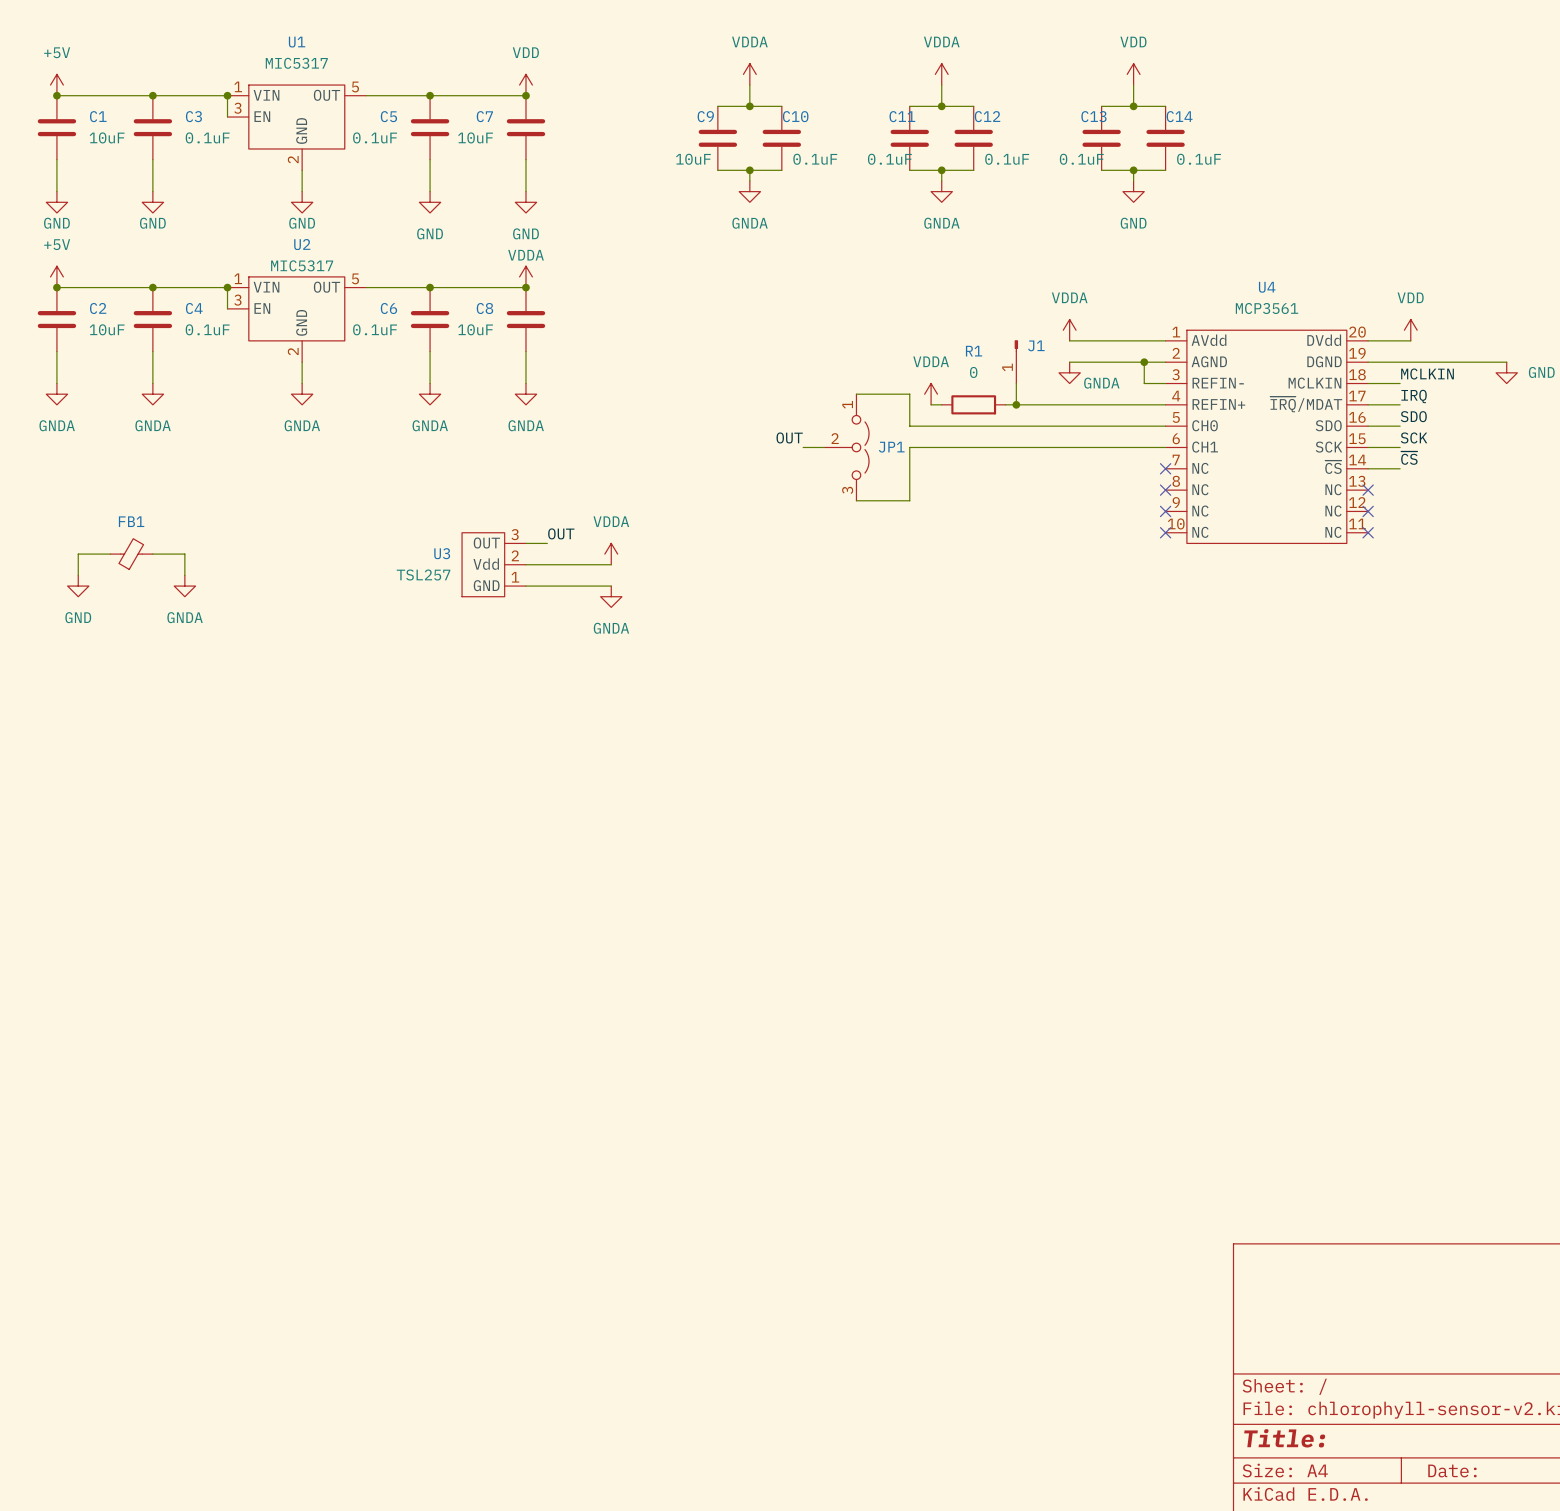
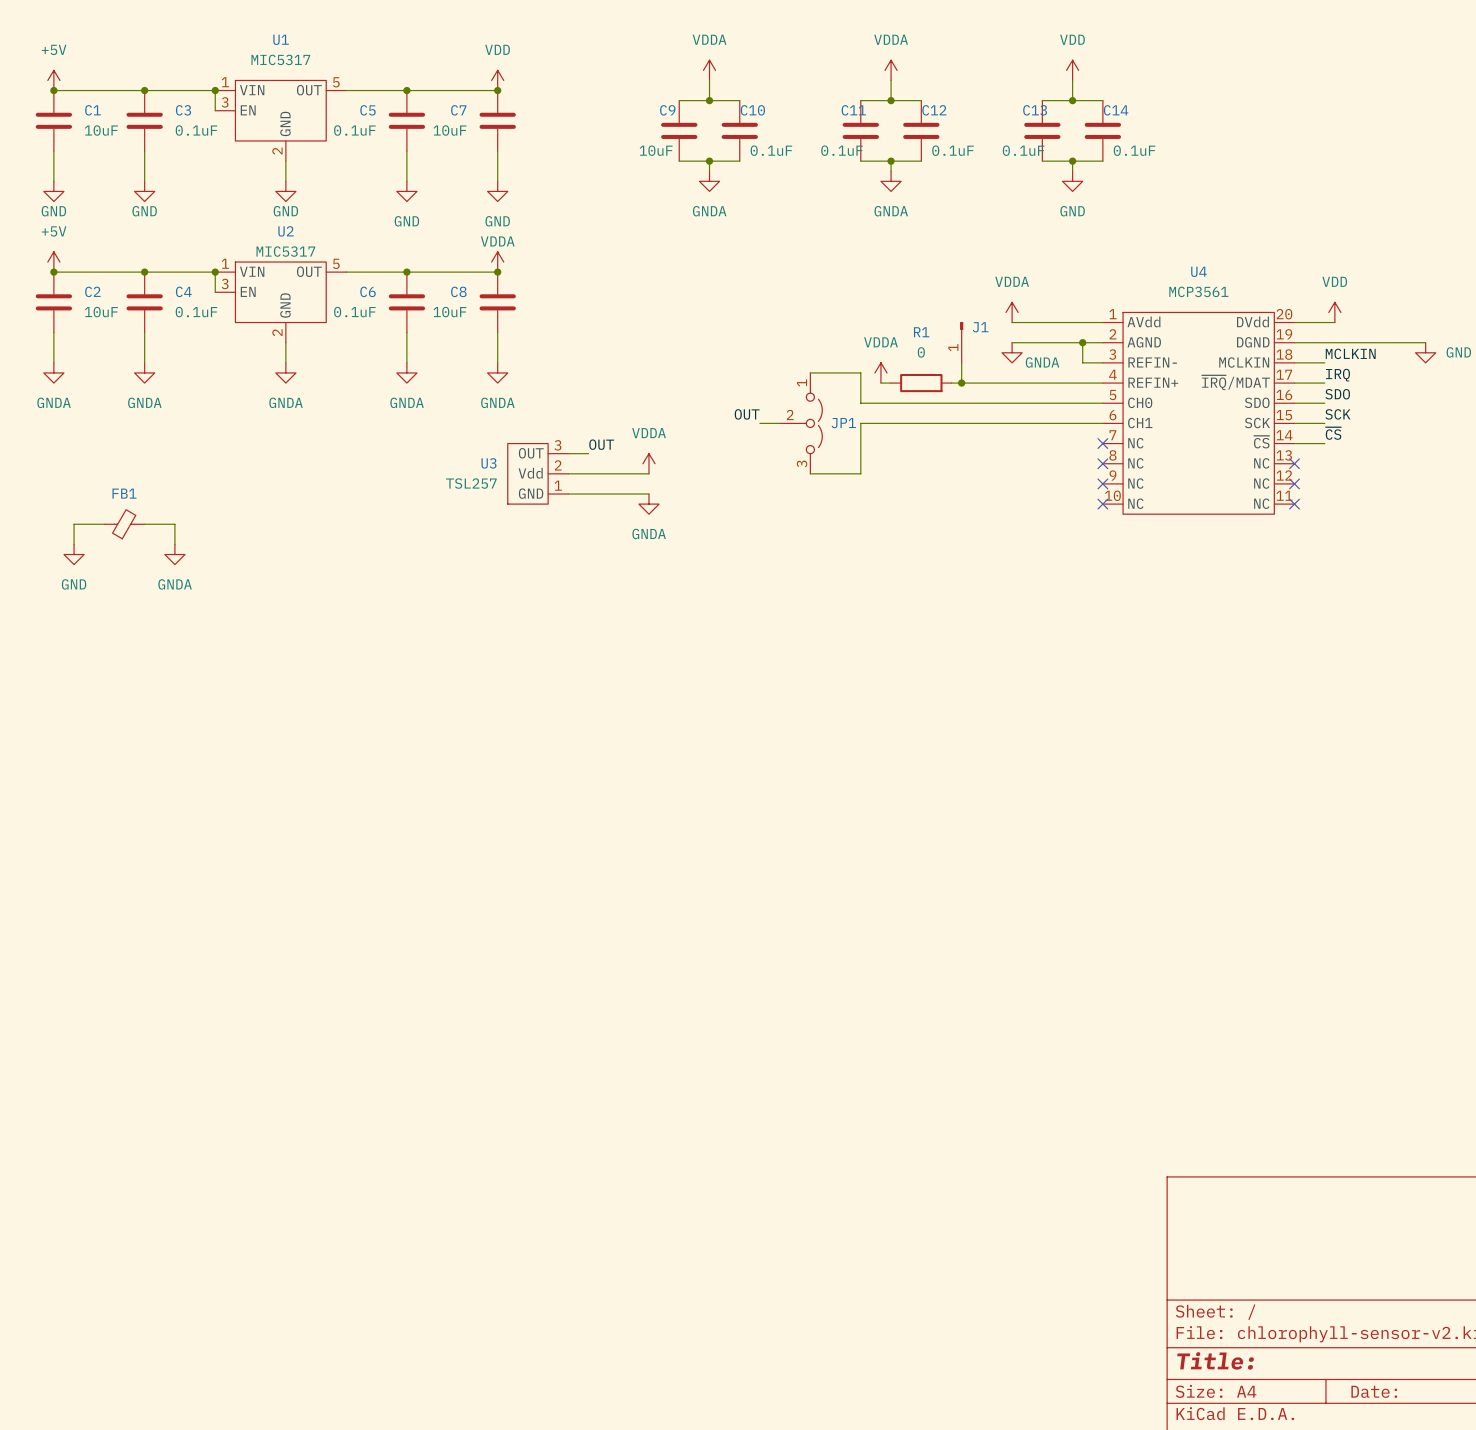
label position: OUT (561, 533) -> OUT (601, 444)
wire: (525, 543) (547, 543) -> (568, 453) (588, 453)
power symbol position: VDDA (611, 554) -> VDDA (648, 463)
U3 position: (494, 564) -> (538, 473)
wire: (525, 564) (611, 564) -> (568, 494) (648, 494)
wire: (525, 586) (611, 586) -> (568, 473) (648, 473)
power symbol position: GNDA (611, 596) -> GNDA (648, 504)

